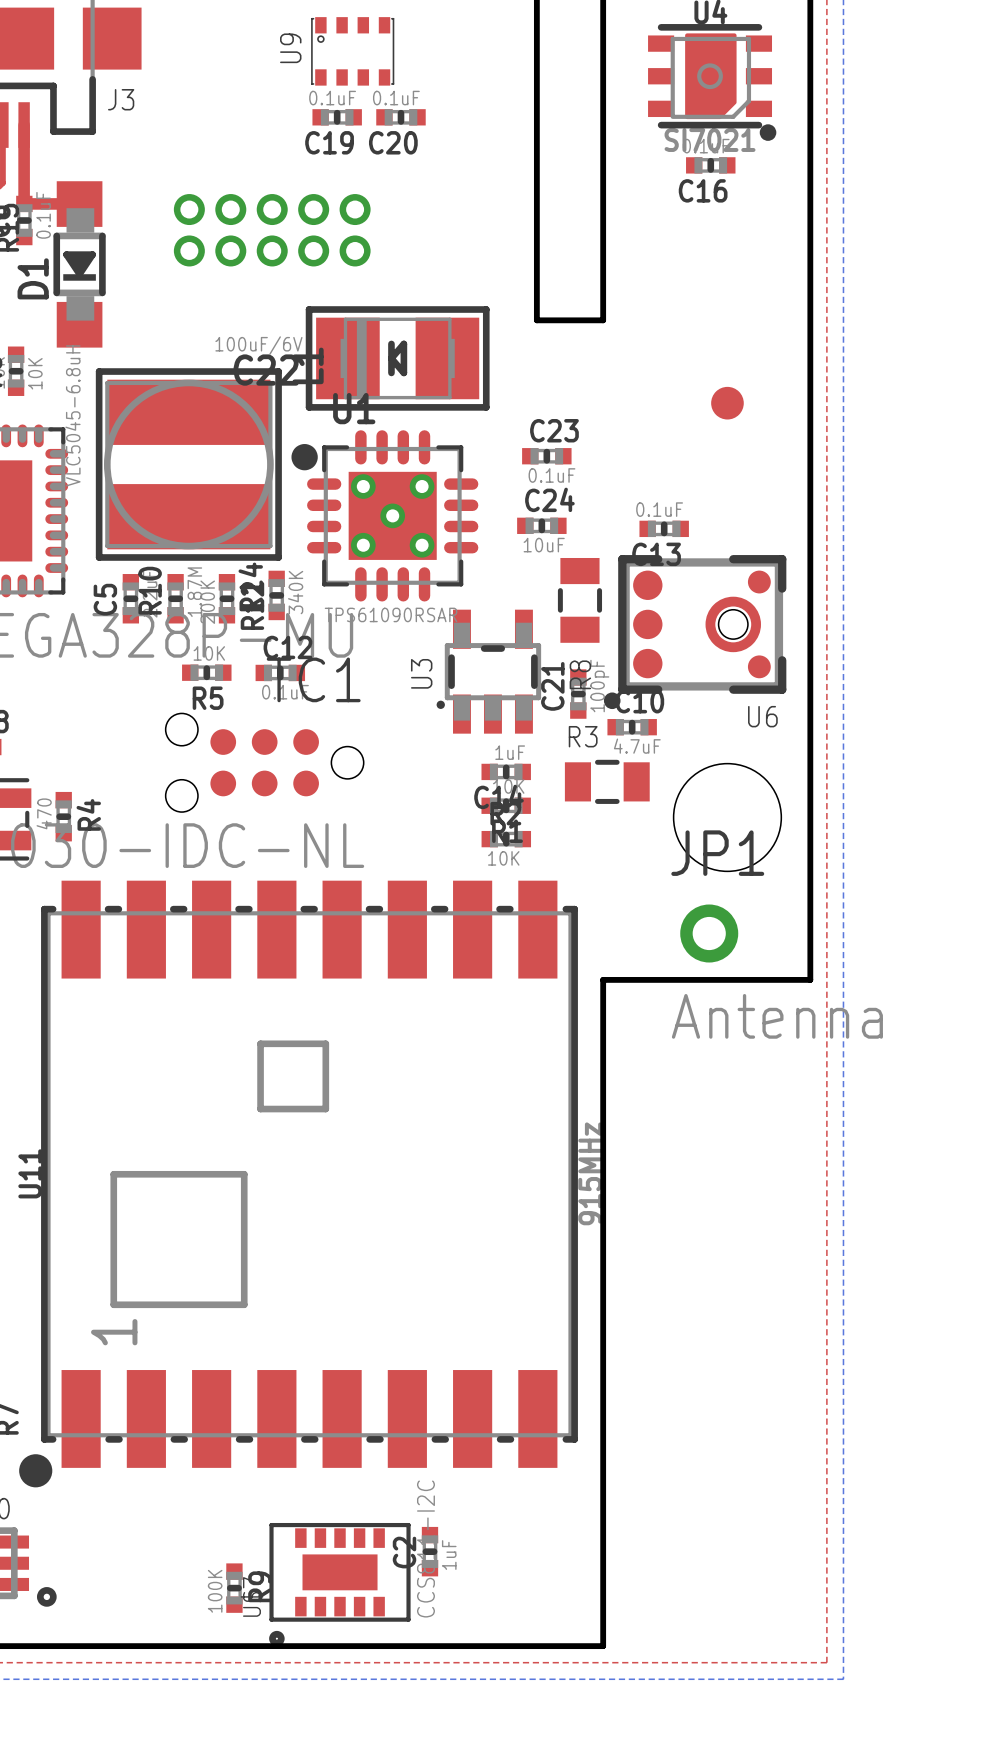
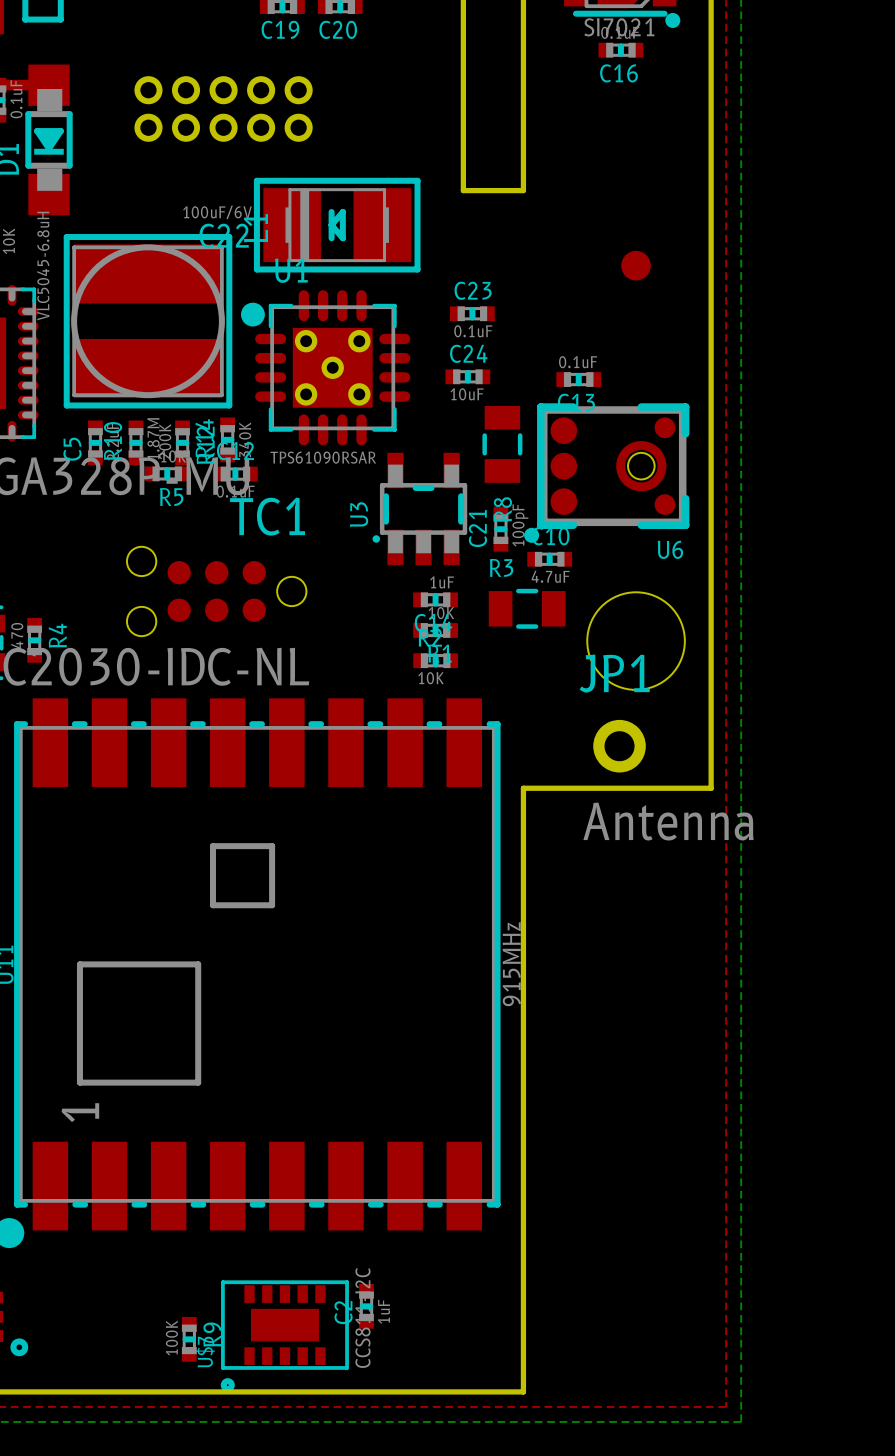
R5 position: (206, 672) -> (167, 473)
C12 position: (280, 672) -> (235, 474)

